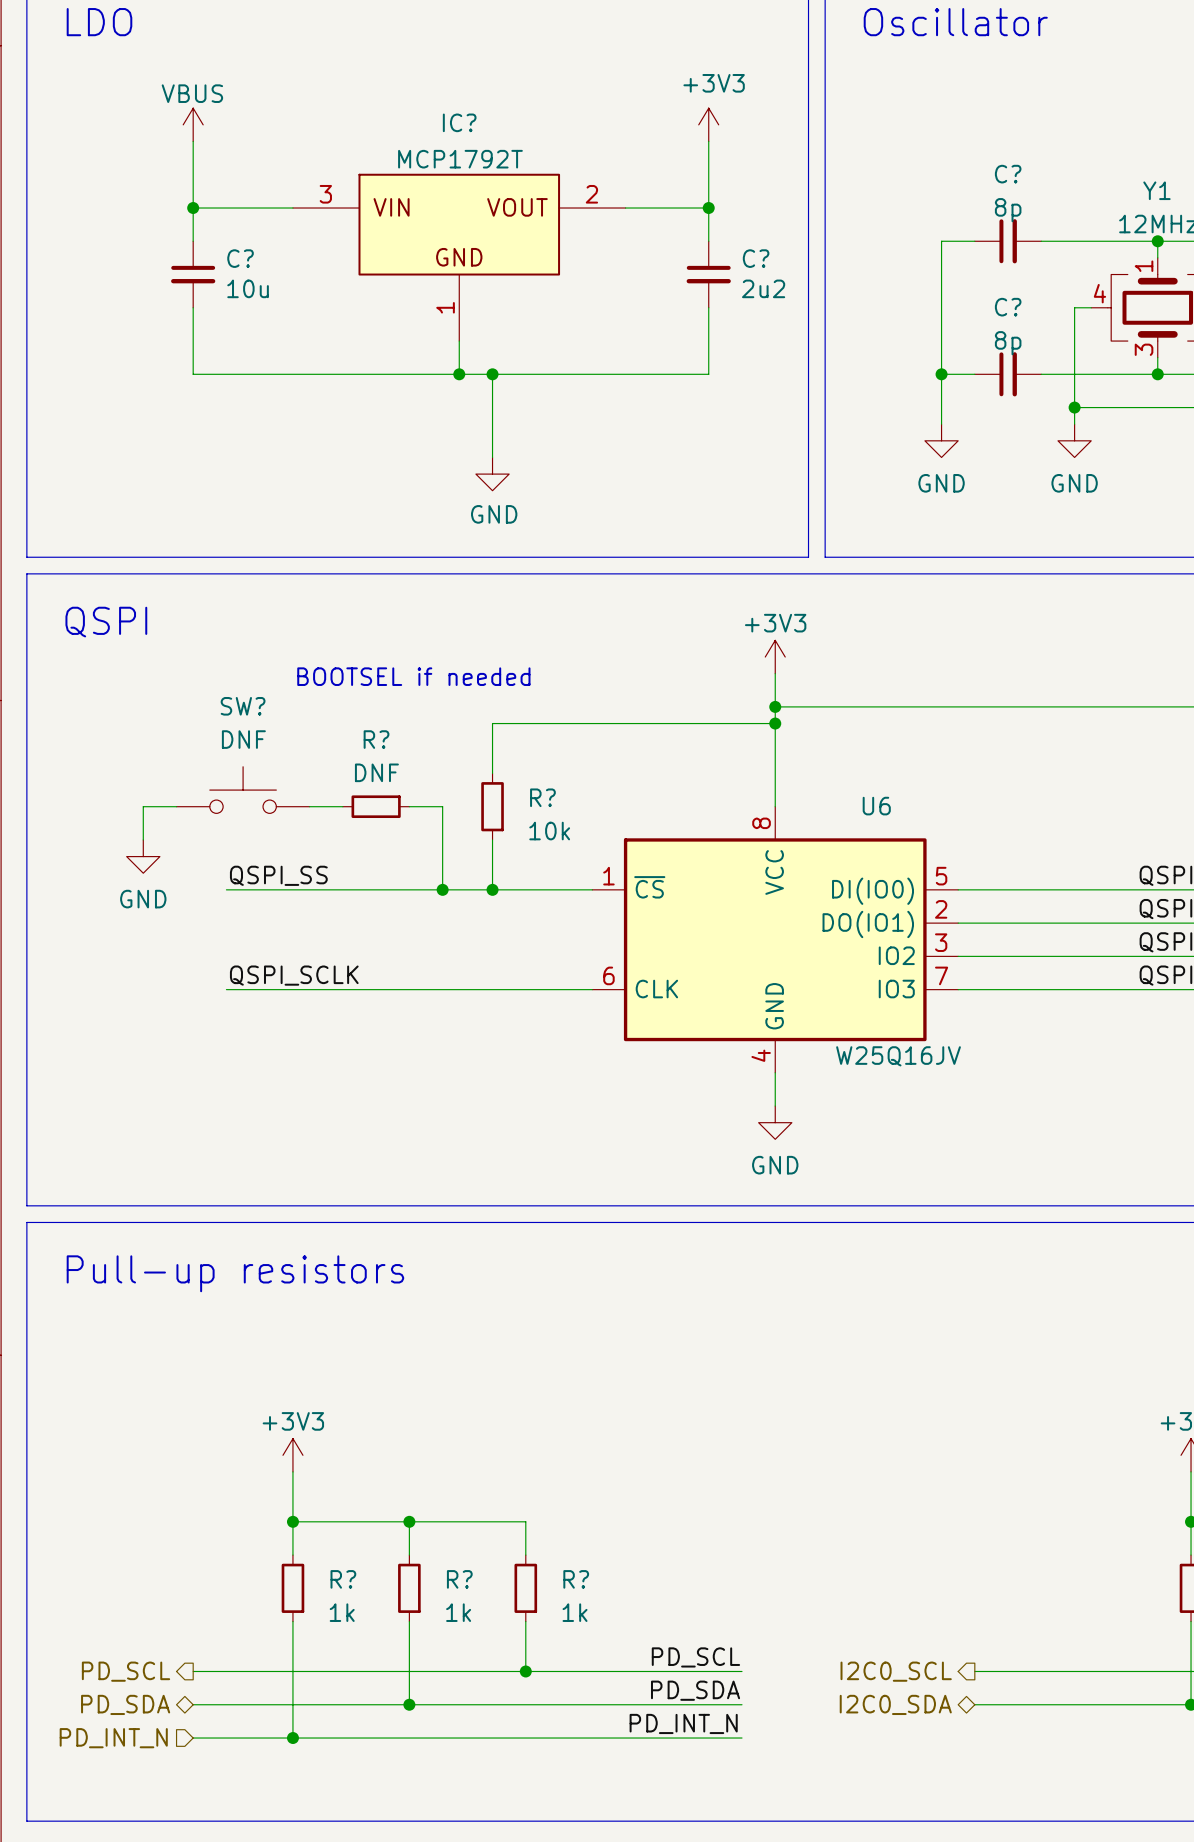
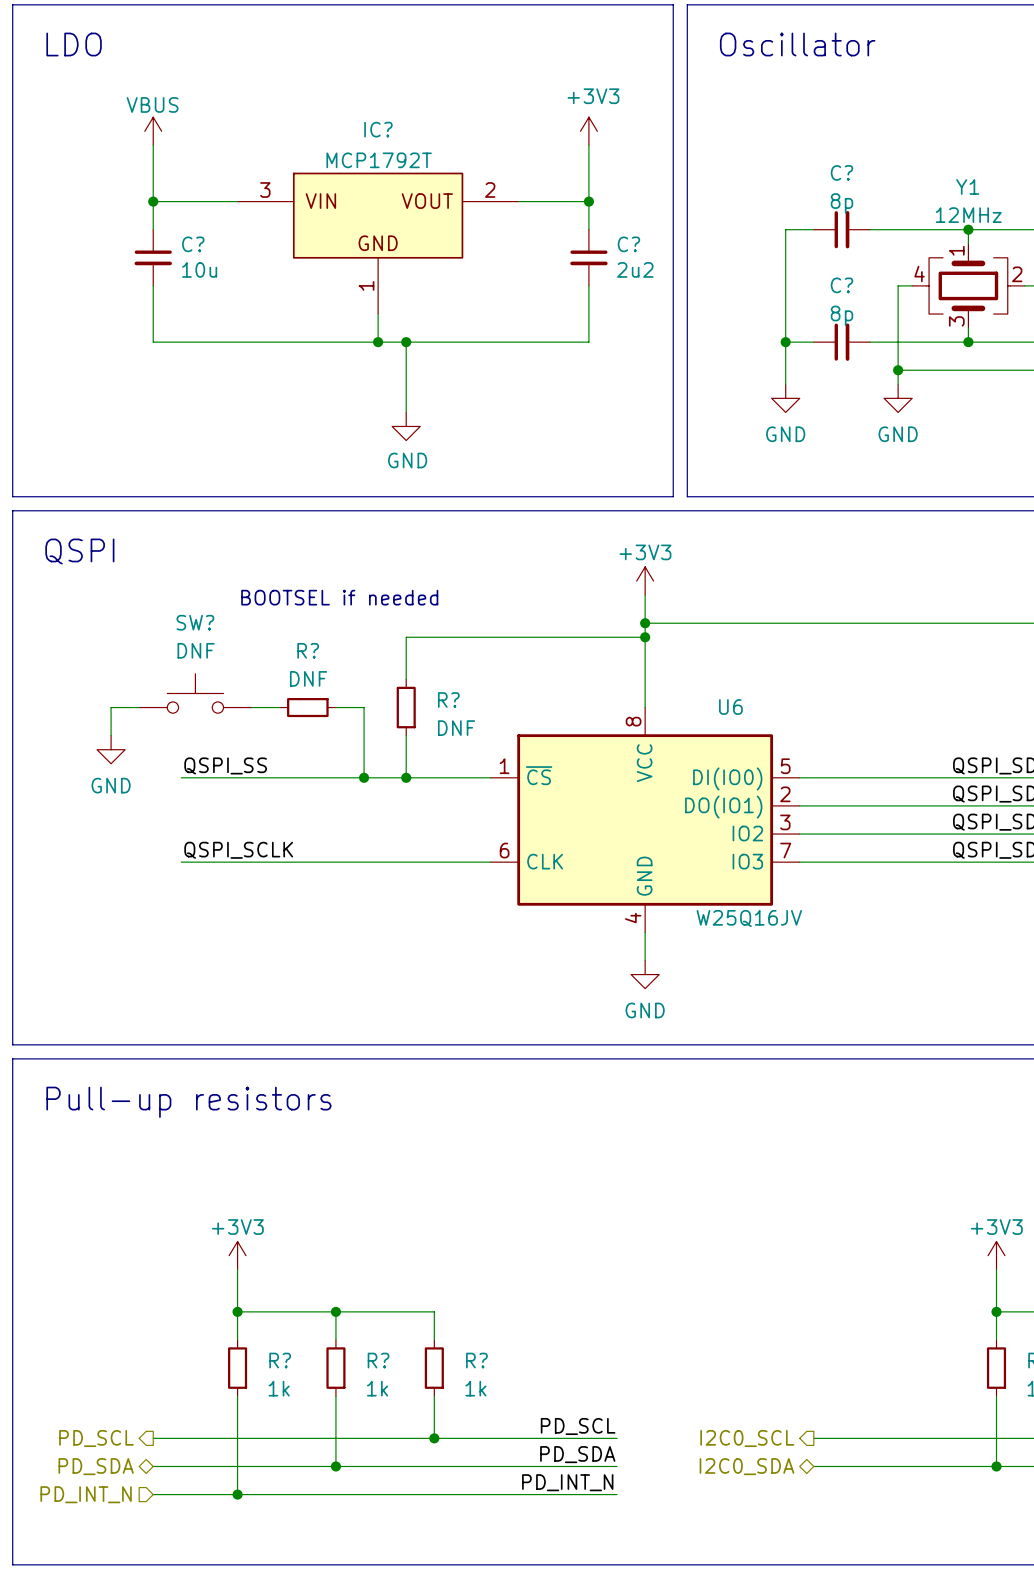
R? value: 10k (549, 831) -> DNF (456, 728)

